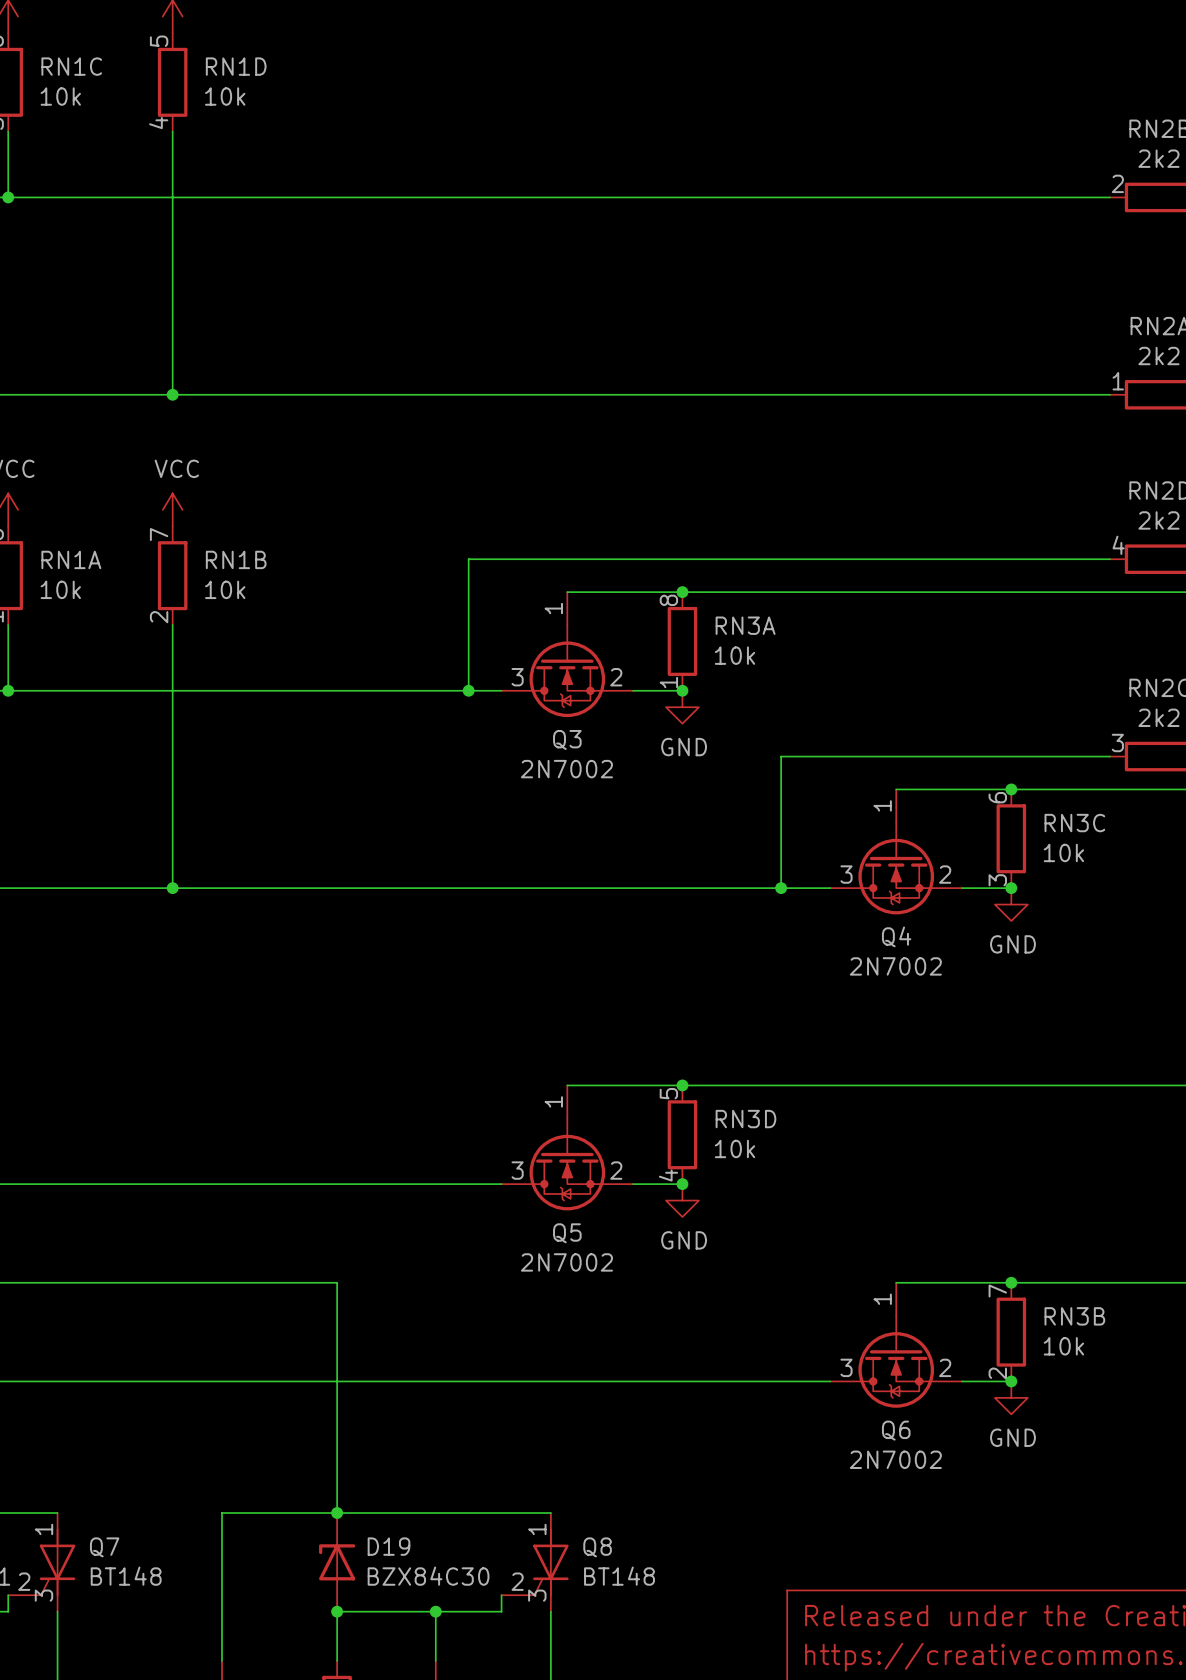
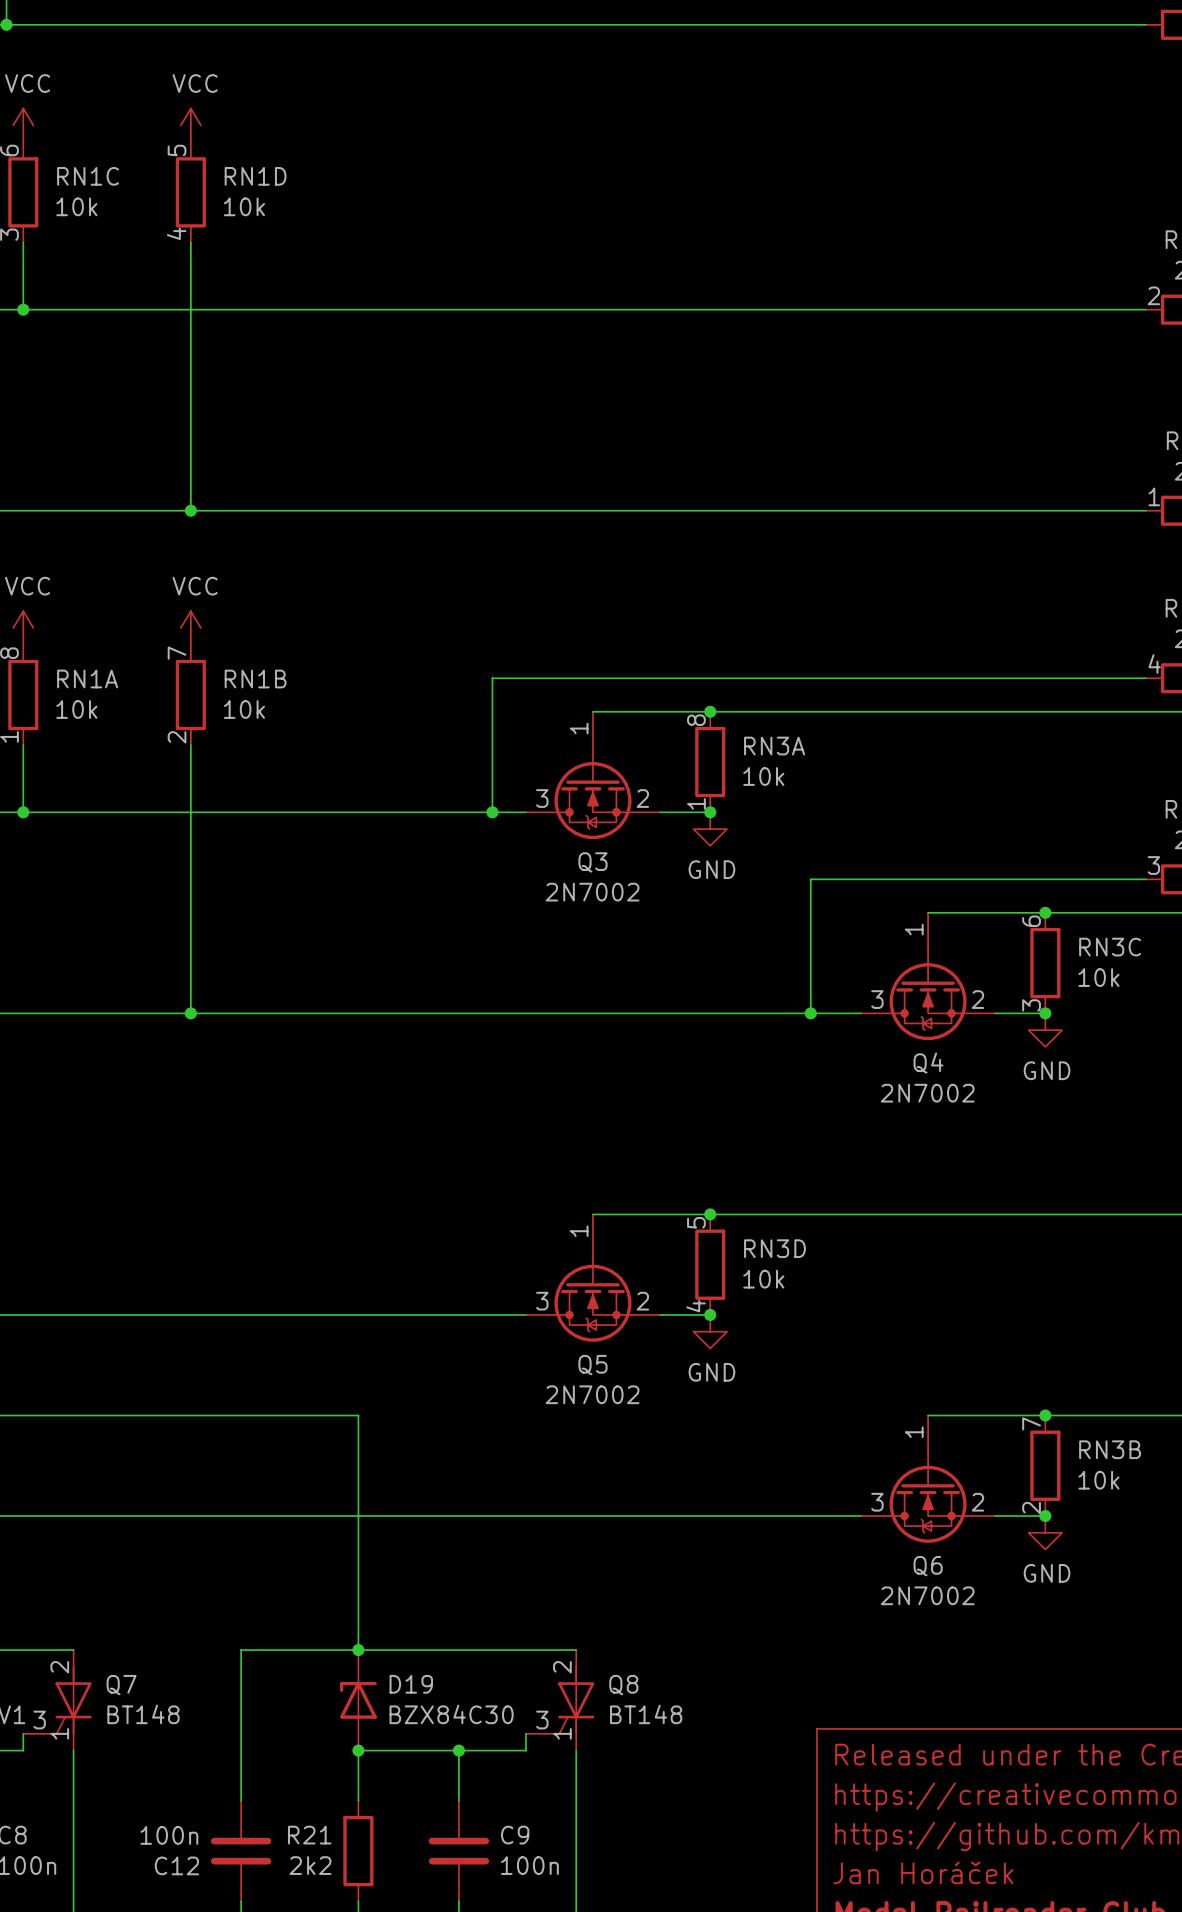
Q7 pin number: 1 (43, 1529) -> 2 (59, 1667)
Q8 pin number: 1 (537, 1529) -> 2 (562, 1667)
Q7 pin number: 2 (24, 1581) -> 3 (39, 1720)
Q8 pin number: 2 (517, 1581) -> 3 (542, 1720)
Q7 pin number: 3 (43, 1595) -> 1 (59, 1733)
Q8 pin number: 3 (537, 1595) -> 1 (562, 1733)

